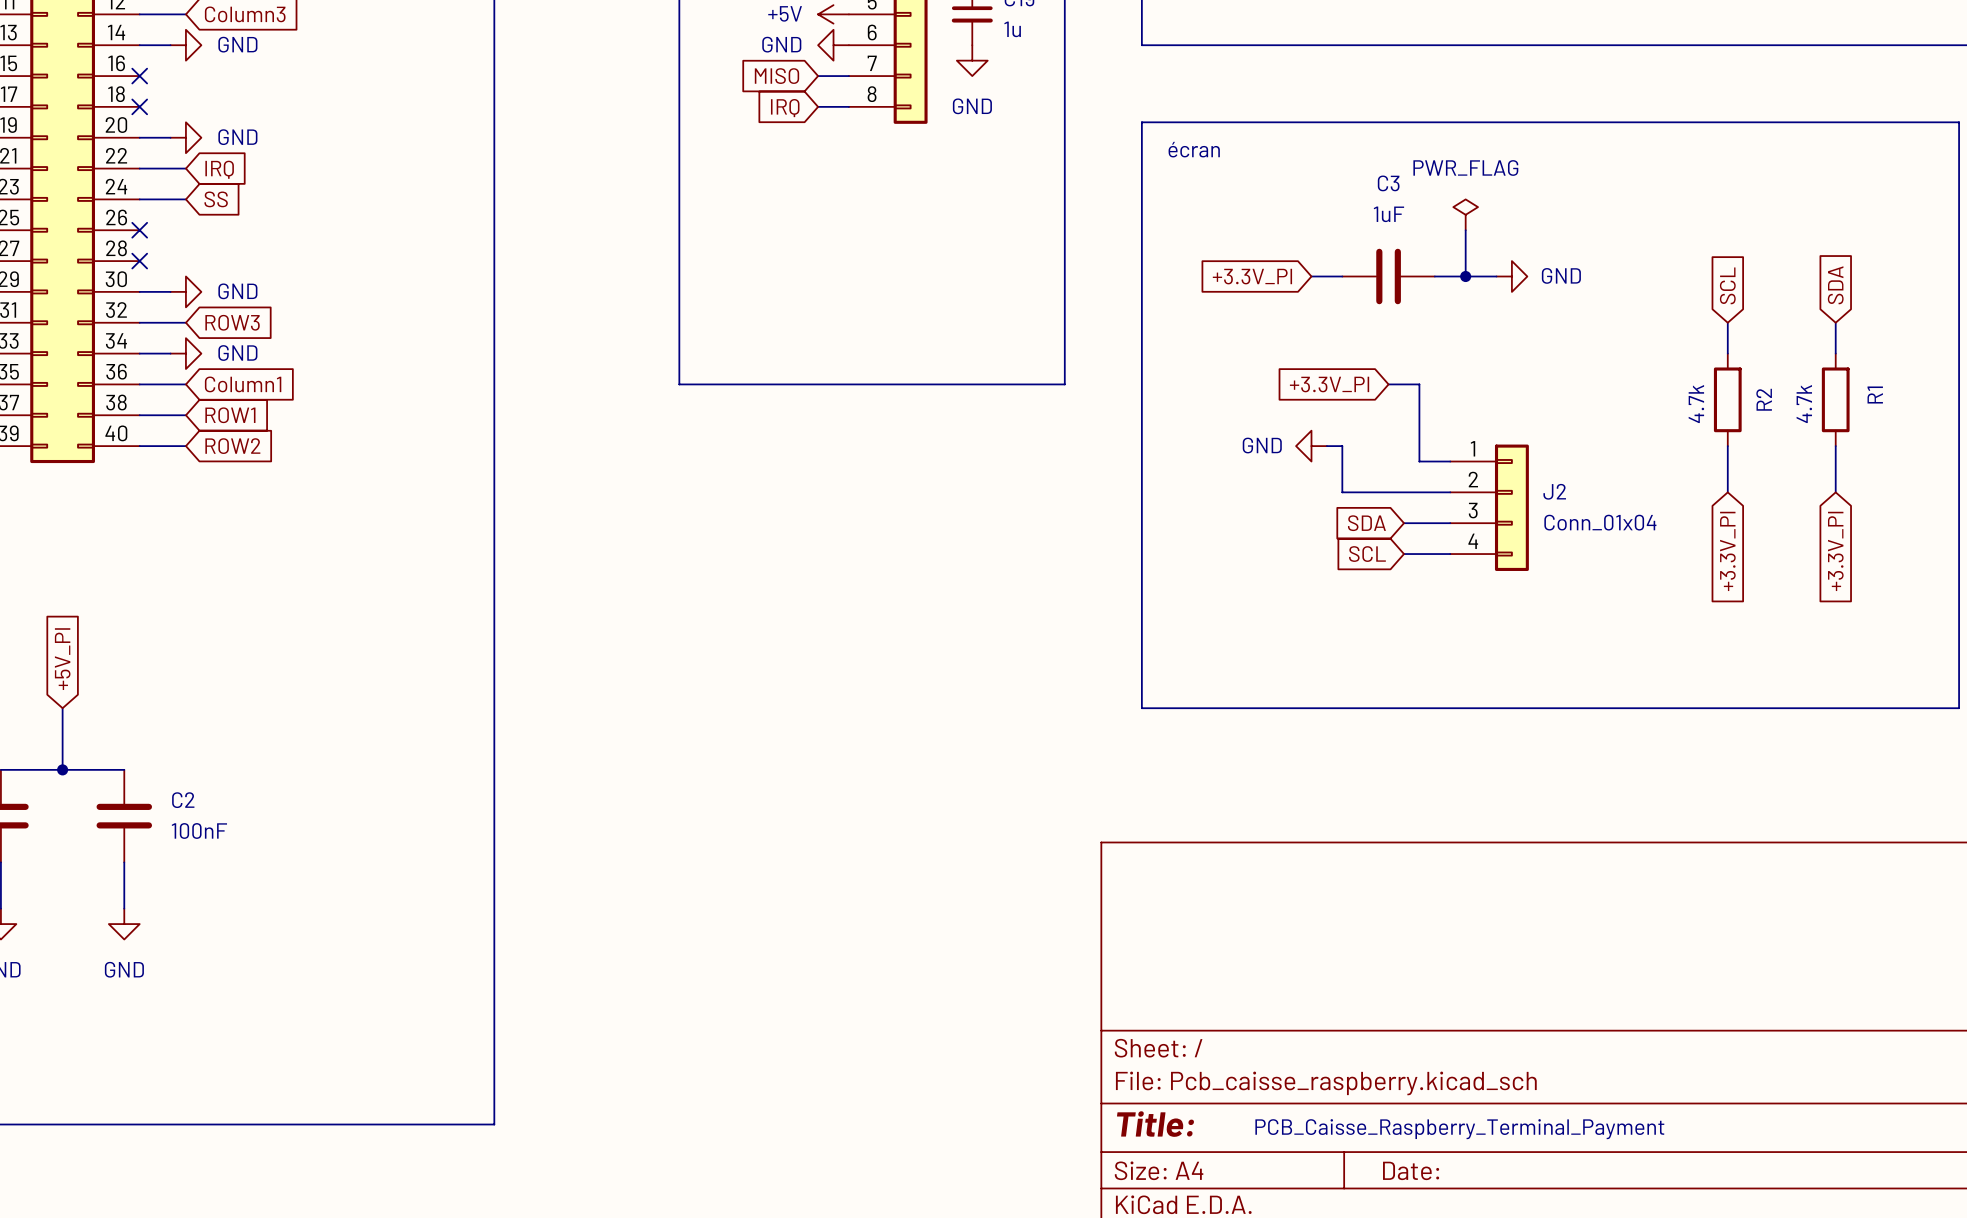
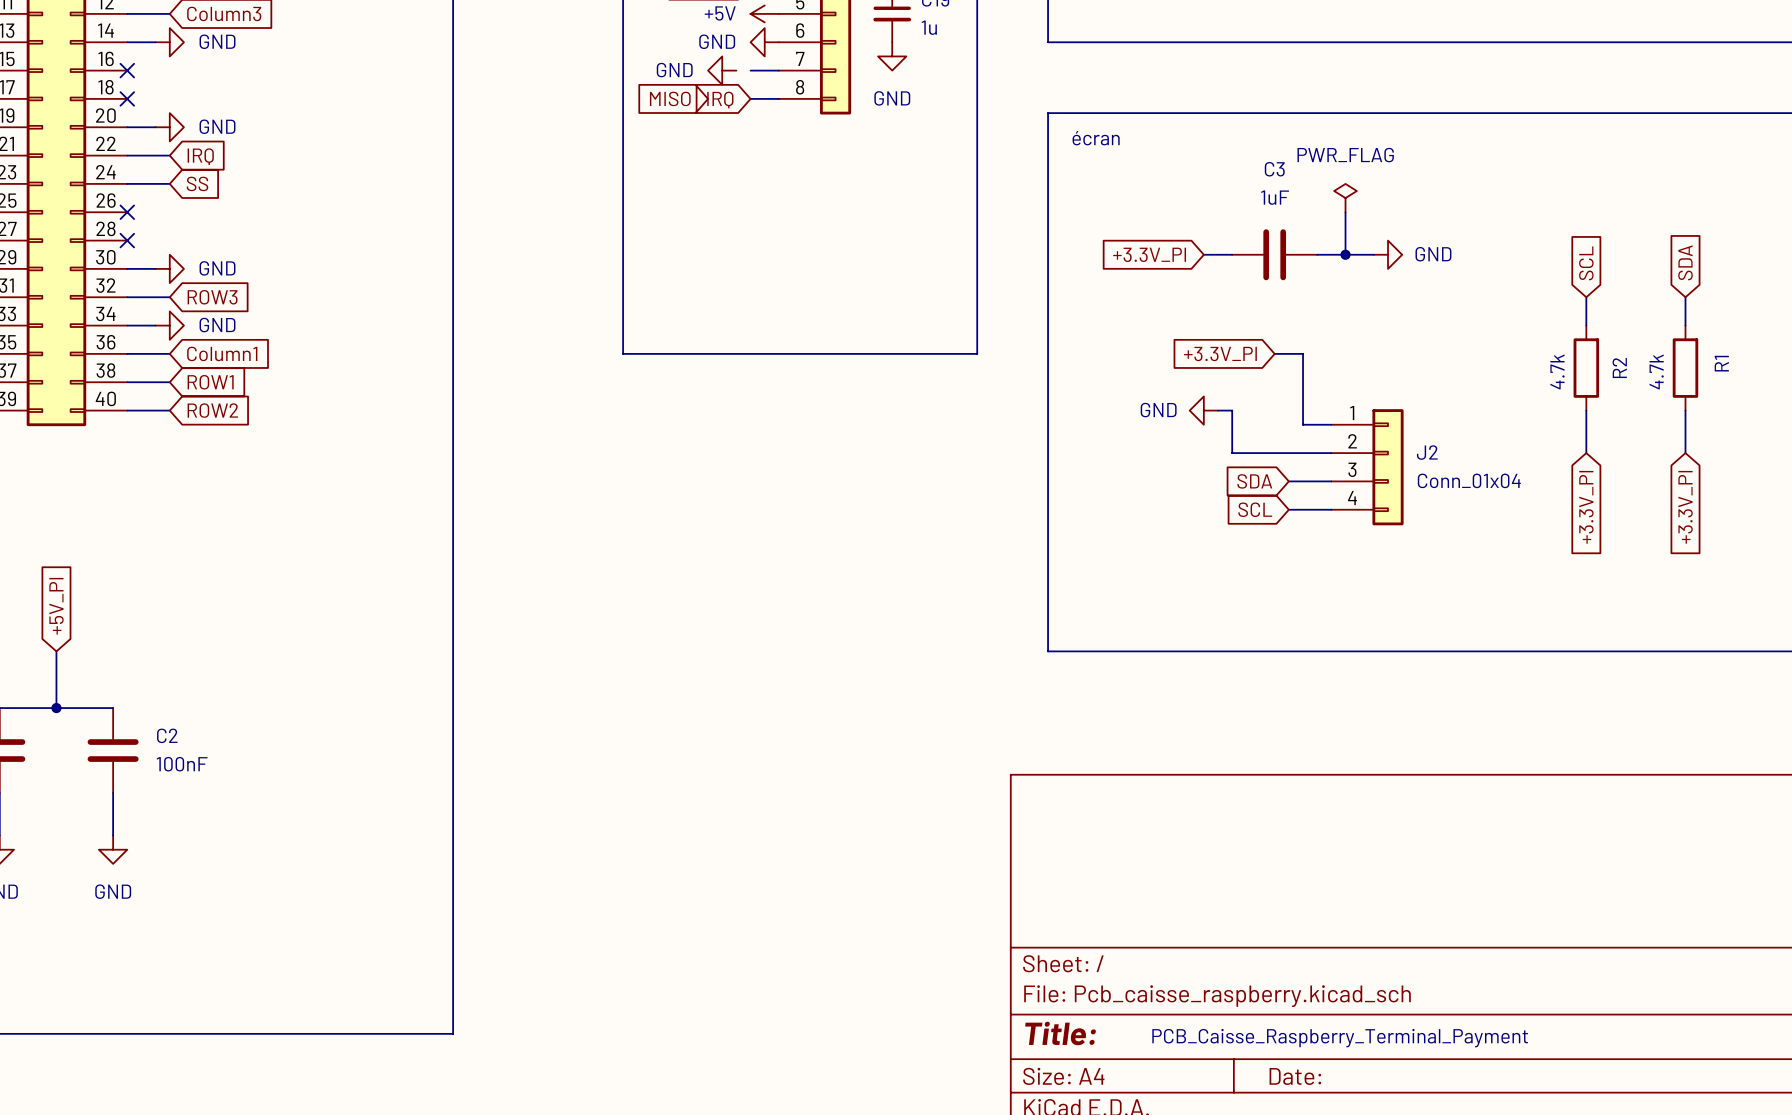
global label position: MISO (776, 76) -> MISO (670, 98)
power symbol: none -> GND (722, 70)

